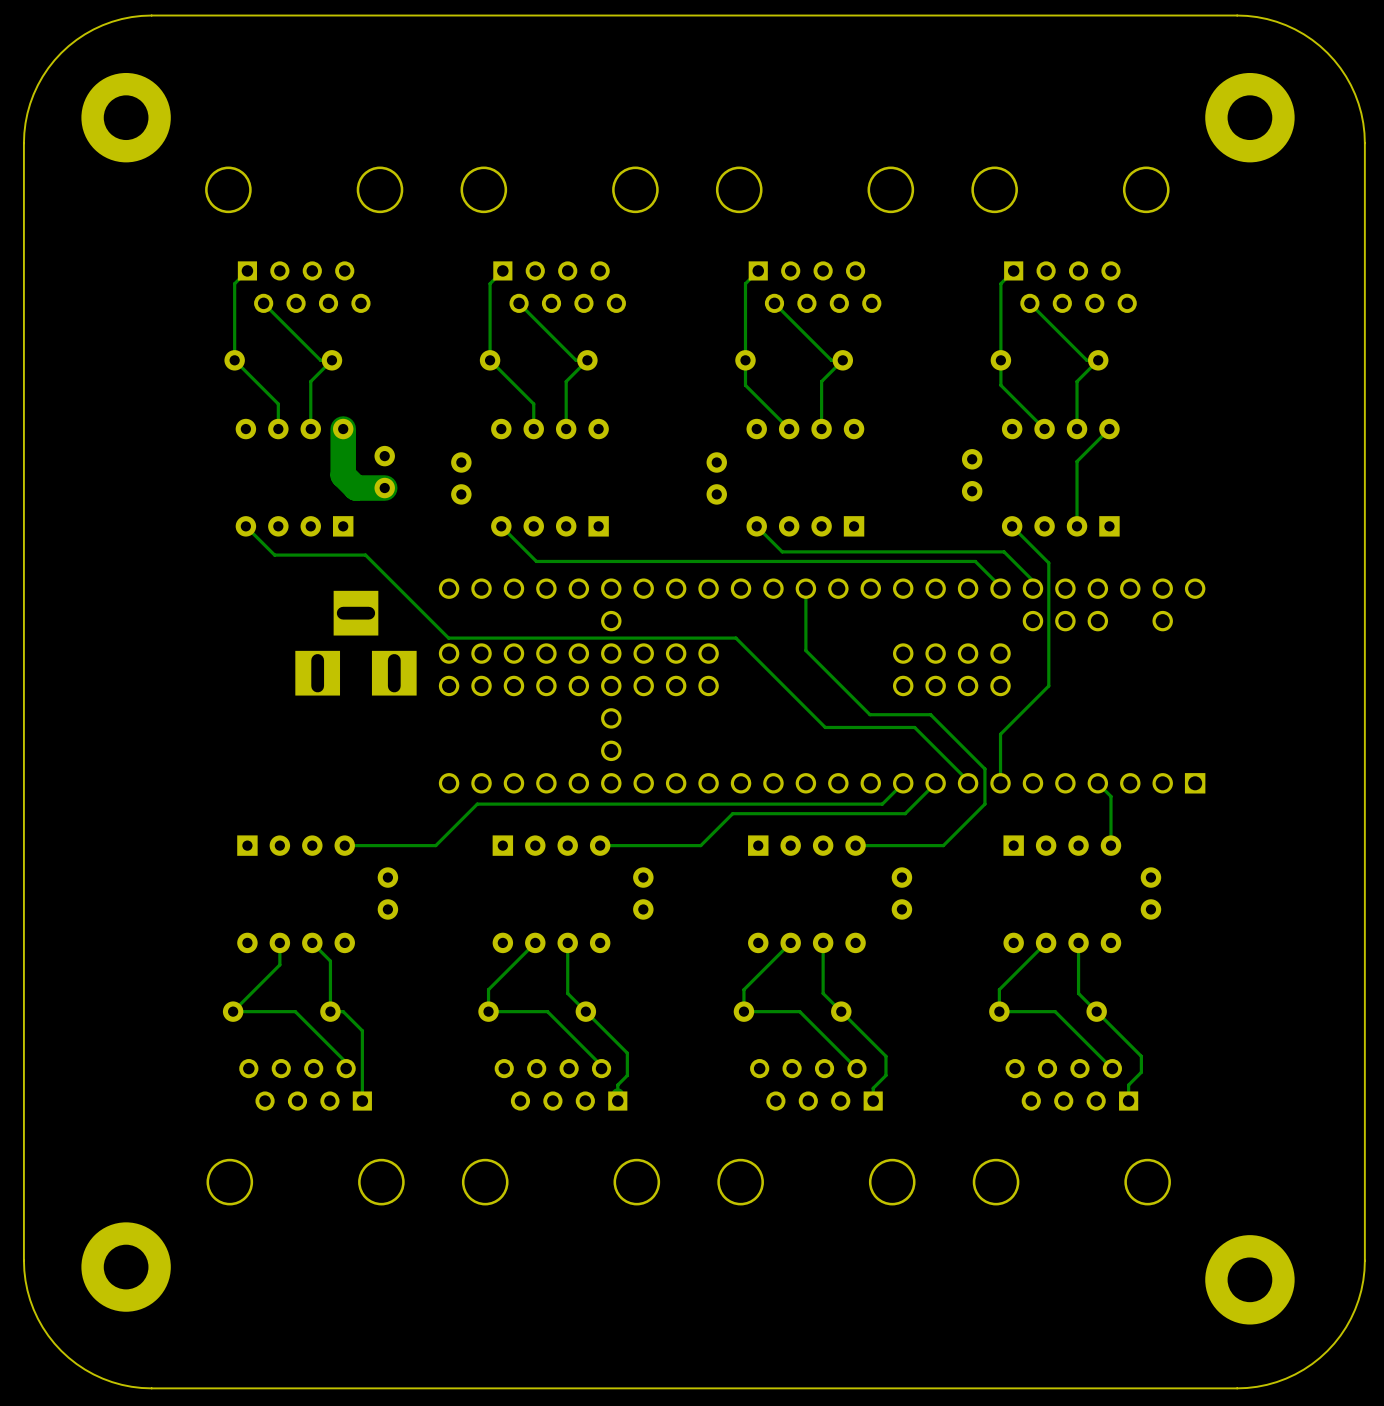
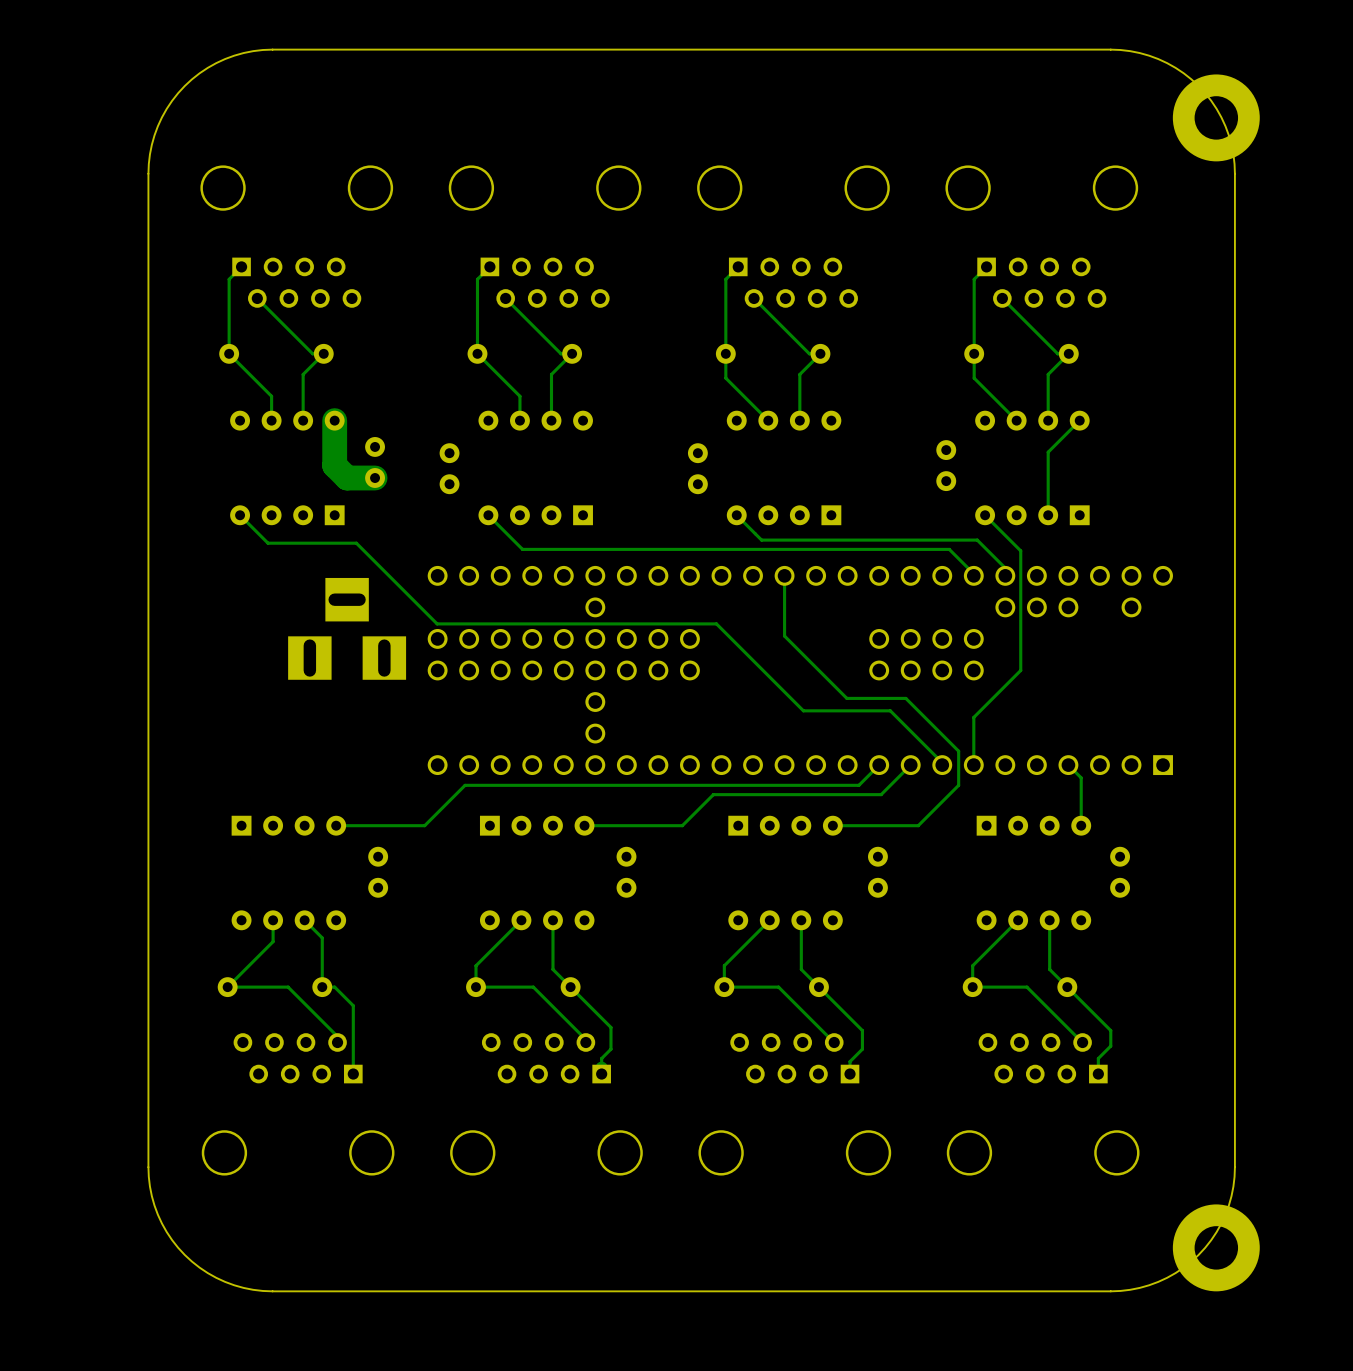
board edge: (1237, 15) (151, 15) (131, 17) (102, 25) (76, 39) (54, 60) (42, 76) (33, 94) (25, 123) (23, 143) (23, 1260) (25, 1280) (33, 1309) (48, 1335) (68, 1357) (84, 1369) (102, 1378) (131, 1386) (151, 1388) (1237, 1388) (1257, 1386) (1286, 1378) (1312, 1363) (1334, 1343) (1346, 1327) (1355, 1309) (1363, 1280) (1364, 1260) (1364, 133) (1358, 103) (1350, 85) (1334, 60) (1320, 46) (1303, 34) (1286, 25) (1266, 19) (1237, 15) -> (1110, 49) (1139, 53) (1158, 59) (1183, 73) (1198, 85) (1211, 100) (1221, 117) (1228, 135) (1234, 164) (1234, 1167) (1233, 1186) (1228, 1205) (1221, 1223) (1211, 1240) (1191, 1261) (1167, 1277) (1139, 1287) (1110, 1291) (272, 1291) (253, 1289) (234, 1285) (216, 1277) (199, 1267) (178, 1247) (161, 1223) (151, 1196) (148, 1167) (148, 173) (149, 154) (154, 135) (161, 117) (172, 100) (191, 79) (216, 63) (234, 55) (262, 49) (1110, 49)
part: (126, 117) -> none
part: (126, 1267) -> none

